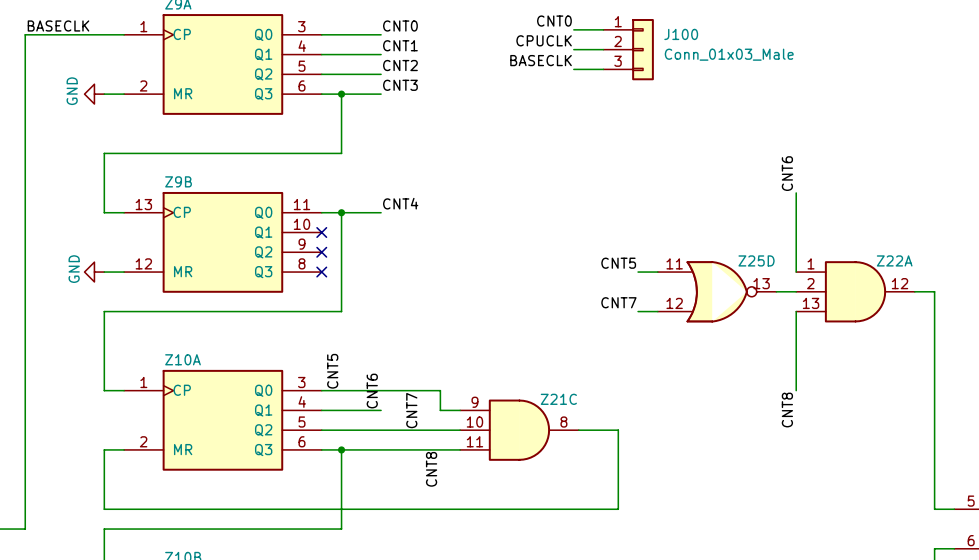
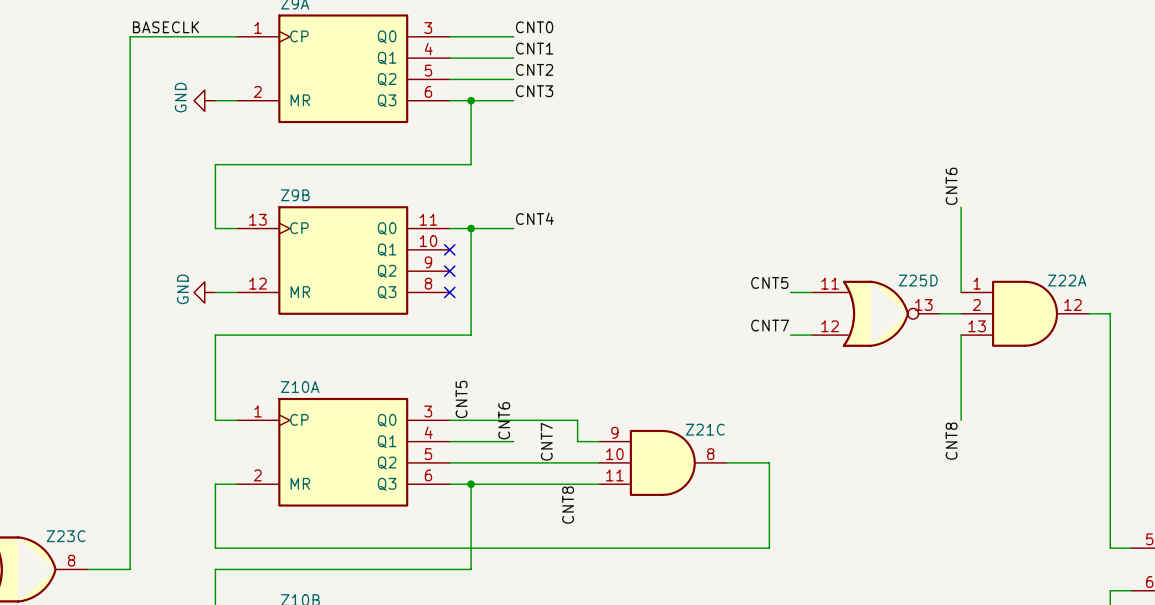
label: CNT0 (554, 21) -> none
wire: (573, 29) (603, 29) -> none
label: CPUCLK (544, 40) -> none
wire: (573, 49) (603, 49) -> none
J100: Conn_01x03_Male (628, 49) -> none
label: BASECLK (541, 60) -> none
wire: (573, 69) (603, 69) -> none

